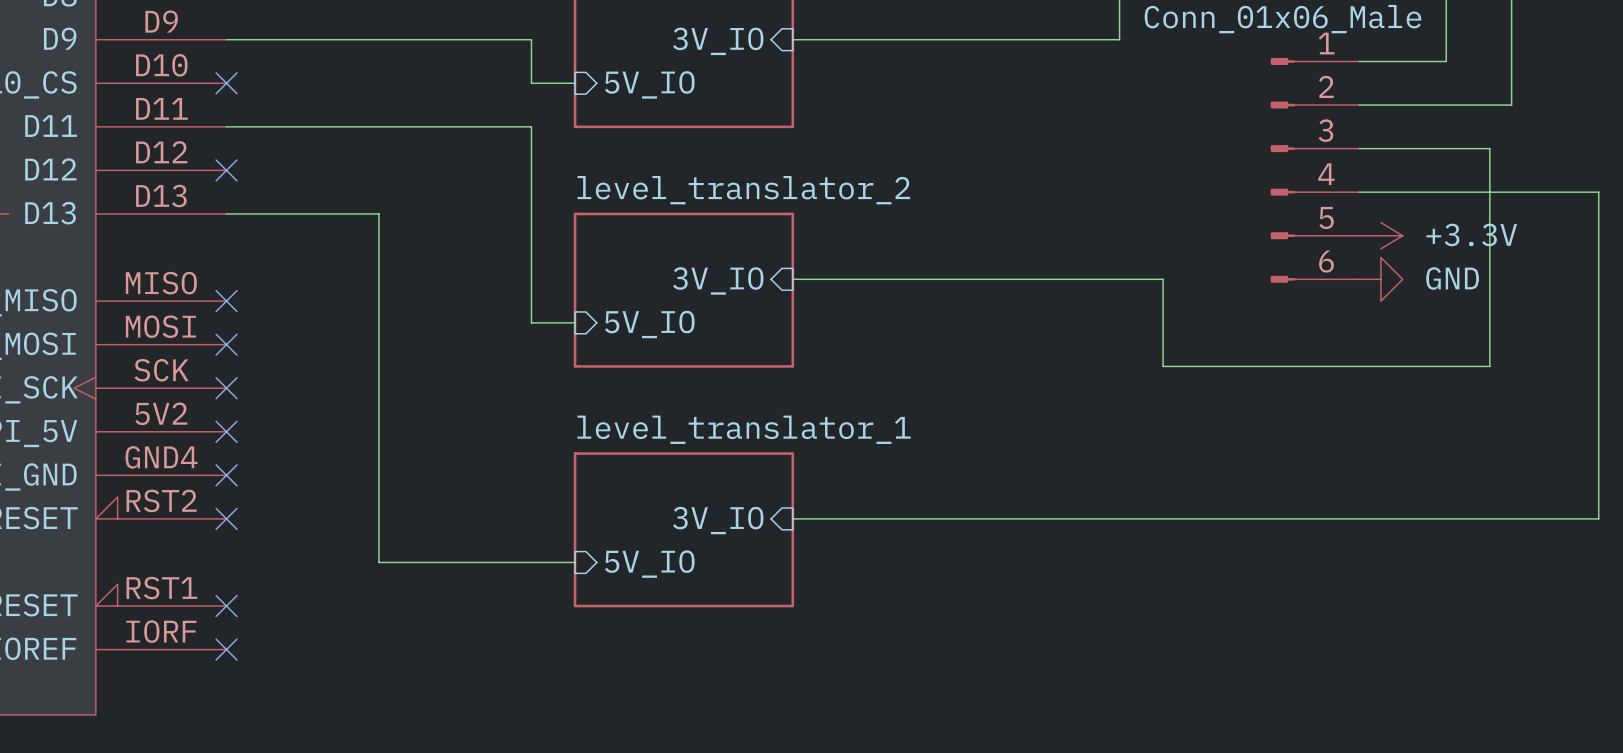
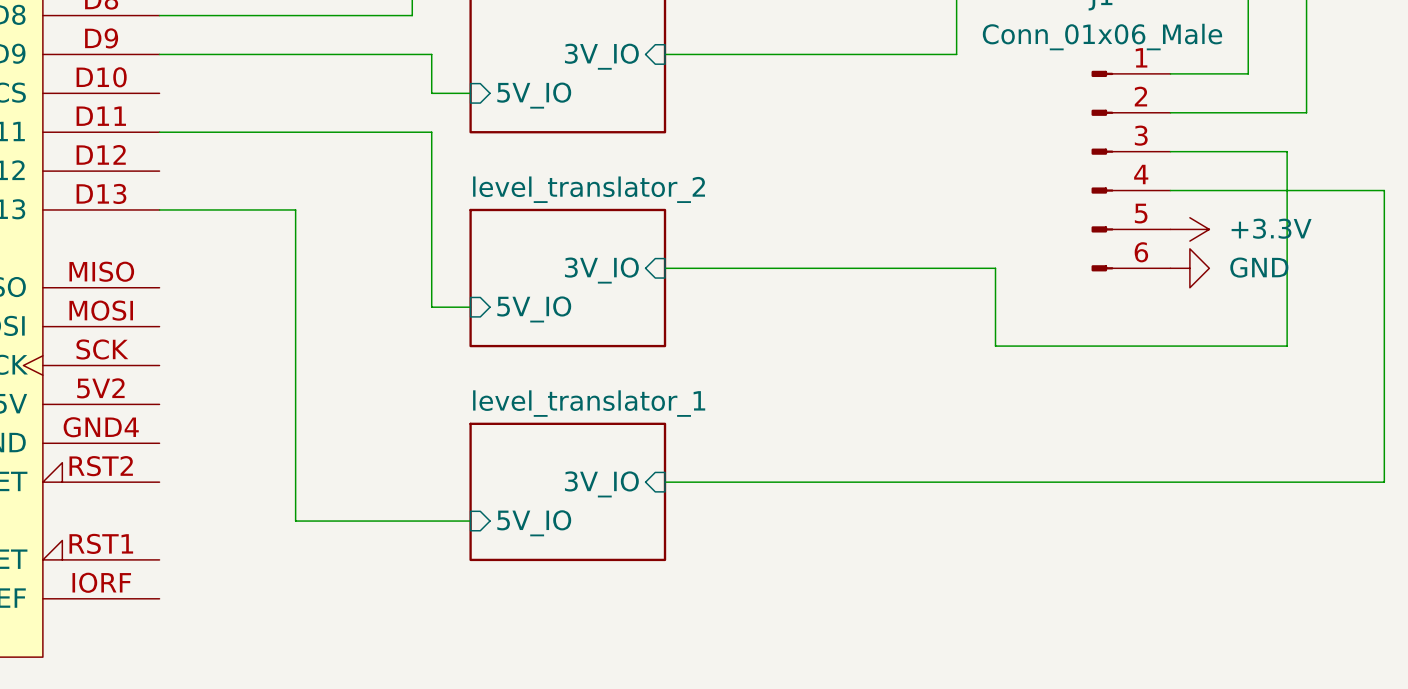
no-connect mark: (226, 83) -> none
no-connect mark: (226, 170) -> none
no-connect mark: (226, 301) -> none
no-connect mark: (226, 344) -> none
no-connect mark: (226, 388) -> none
no-connect mark: (226, 431) -> none
no-connect mark: (226, 475) -> none
no-connect mark: (226, 518) -> none
no-connect mark: (226, 606) -> none
no-connect mark: (226, 649) -> none

